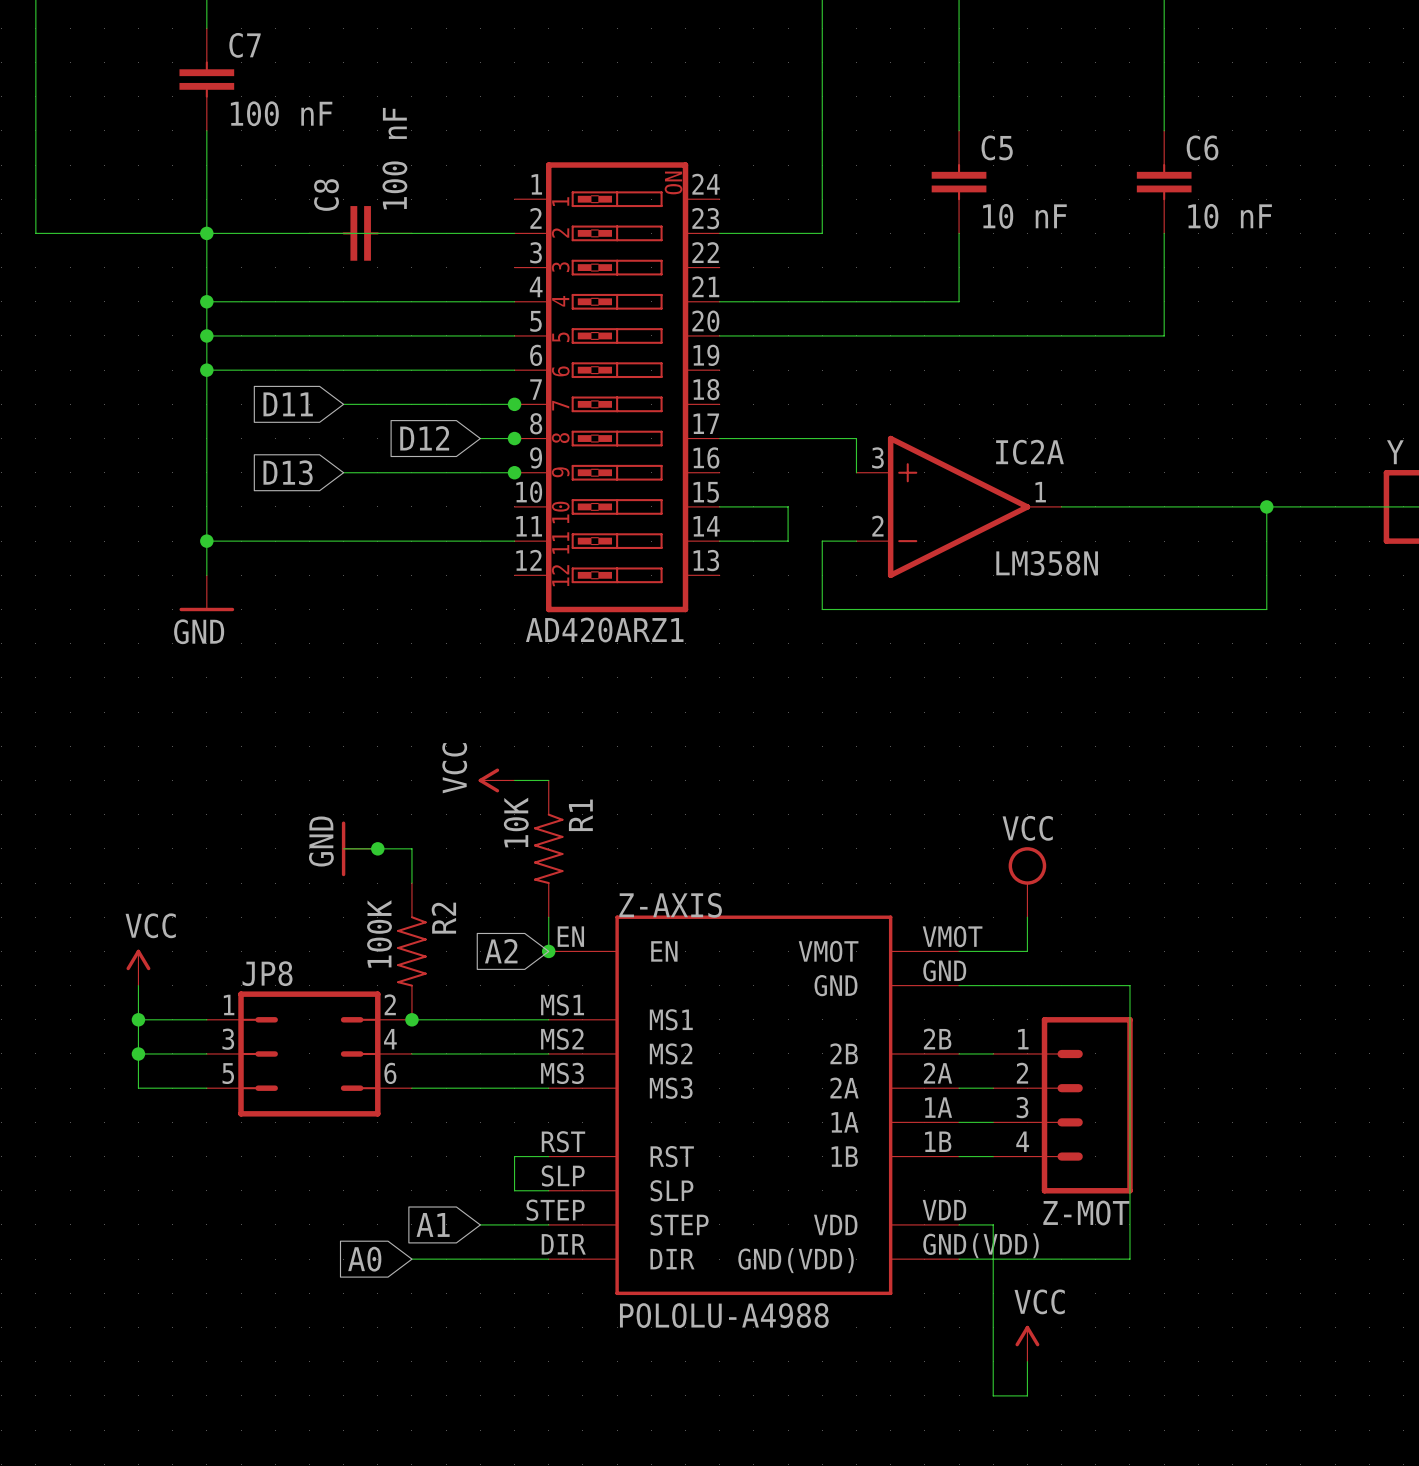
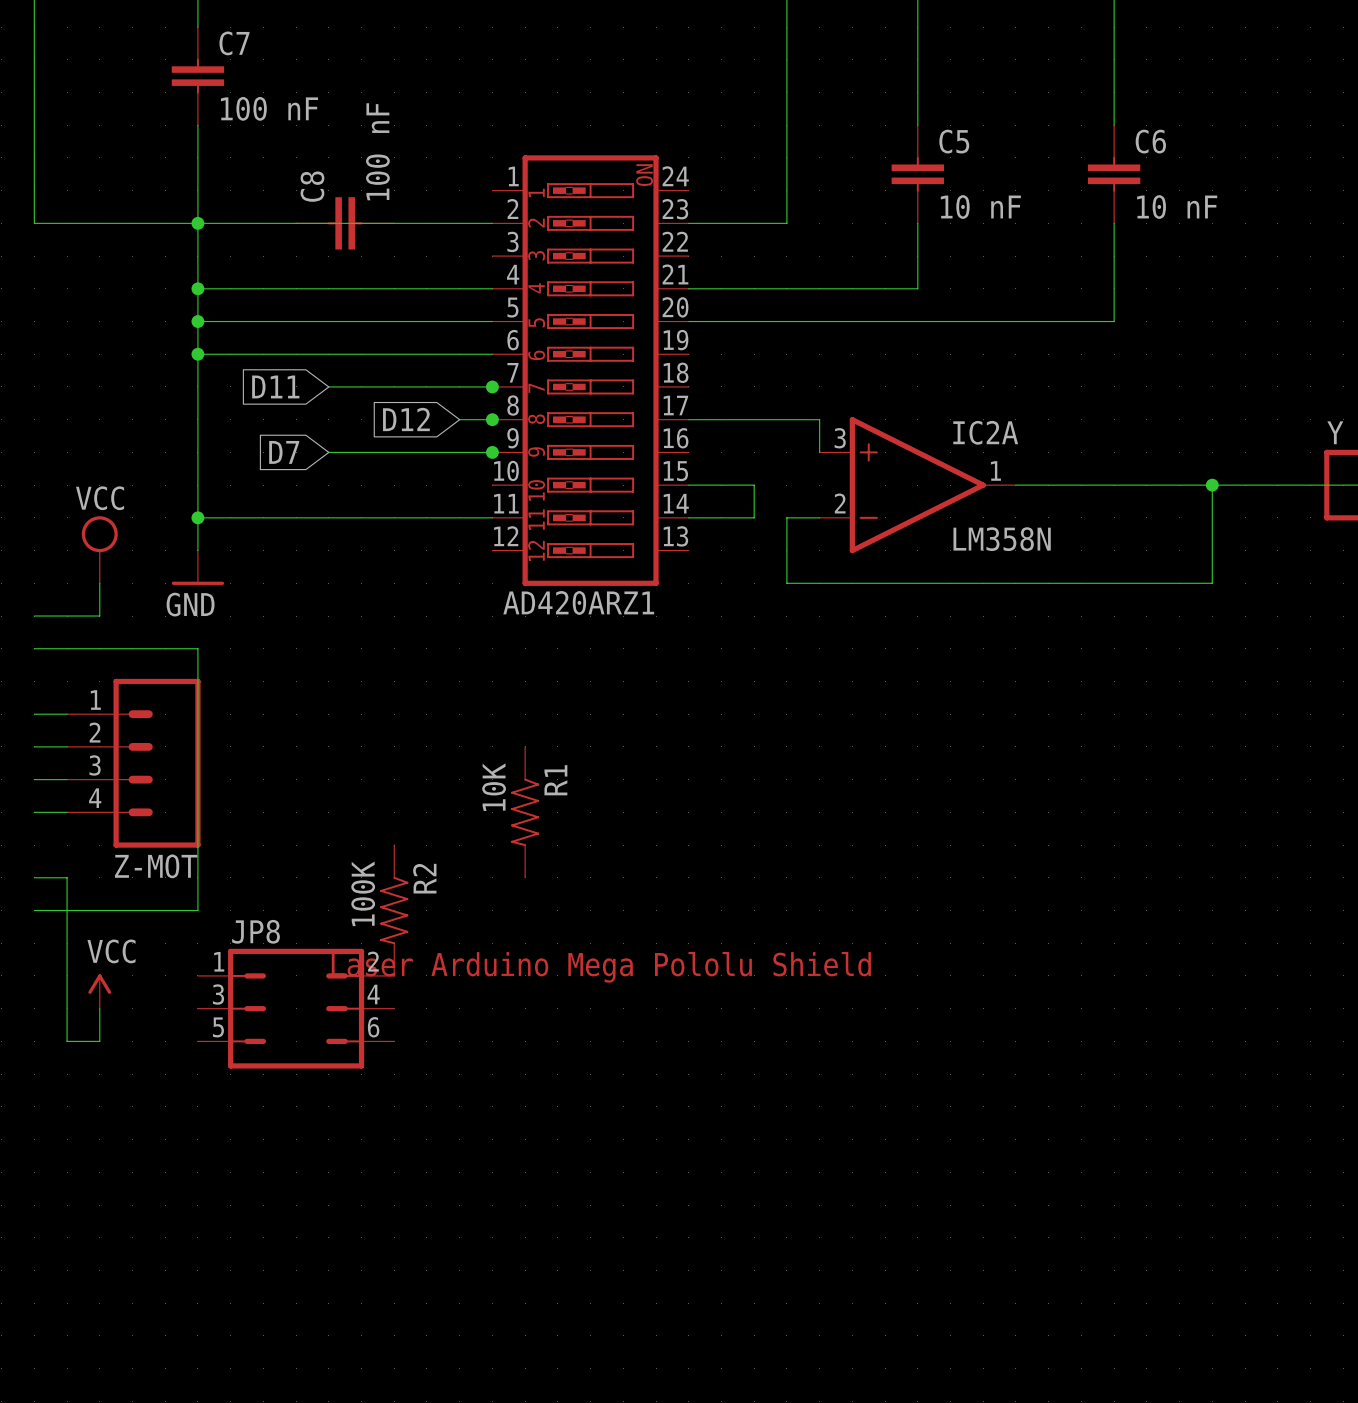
global label: D13 (288, 472) -> D7 (284, 452)
power symbol: none -> VCC (99, 549)
wire: none -> (99, 583) (99, 616) (34, 616)
wire: none -> (34, 648) (197, 648) (197, 910) (34, 910)
wire: none -> (34, 714) (67, 714)
wire: none -> (34, 746) (67, 746)
power symbol: VCC (496, 780) -> none
wire: (514, 780) (548, 780) -> none
Z-MOT: none -> (133, 763)
wire: none -> (34, 779) (67, 779)
wire: none -> (34, 812) (67, 812)
wire: (343, 848) (411, 848) (411, 883) -> none
power symbol: GND (359, 848) -> none
junction: (377, 848) -> none
power symbol: VCC (1027, 882) -> none
wire: none -> (34, 877) (67, 877) (67, 1041) (99, 1041) (99, 1008)
wire: (548, 917) (548, 951) -> none
wire: (1027, 917) (1027, 951) (959, 951) -> none
global label: A2 (501, 951) -> none
junction: (548, 951) -> none
power symbol position: VCC (138, 967) -> VCC (99, 991)
wire: (138, 985) (138, 1088) (206, 1088) -> none
wire: (959, 985) (1129, 985) (1129, 1259) (959, 1259) -> none
text: none -> Laser Arduino Mega Pololu Shield (601, 967)
wire: (138, 1019) (206, 1019) -> none
junction: (138, 1019) -> none
wire: (411, 1019) (548, 1019) -> none
junction: (411, 1019) -> none
wire: (138, 1053) (206, 1053) -> none
junction: (138, 1053) -> none
wire: (411, 1053) (548, 1053) -> none
wire: (959, 1053) (993, 1053) -> none
wire: (411, 1088) (548, 1088) -> none
wire: (959, 1088) (993, 1088) -> none
Z-AXIS: POLOLU-A4988 (753, 1105) -> none
Z-MOT: (1062, 1105) -> none
wire: (959, 1122) (993, 1122) -> none
wire: (548, 1156) (514, 1156) (514, 1190) (548, 1190) -> none
wire: (959, 1156) (993, 1156) -> none
global label: A1 (433, 1224) -> none
wire: (480, 1224) (548, 1224) -> none
wire: (959, 1224) (993, 1224) (993, 1395) (1027, 1395) (1027, 1361) -> none
global label: A0 (364, 1259) -> none
wire: (411, 1259) (548, 1259) -> none
power symbol: VCC (1027, 1343) -> none

